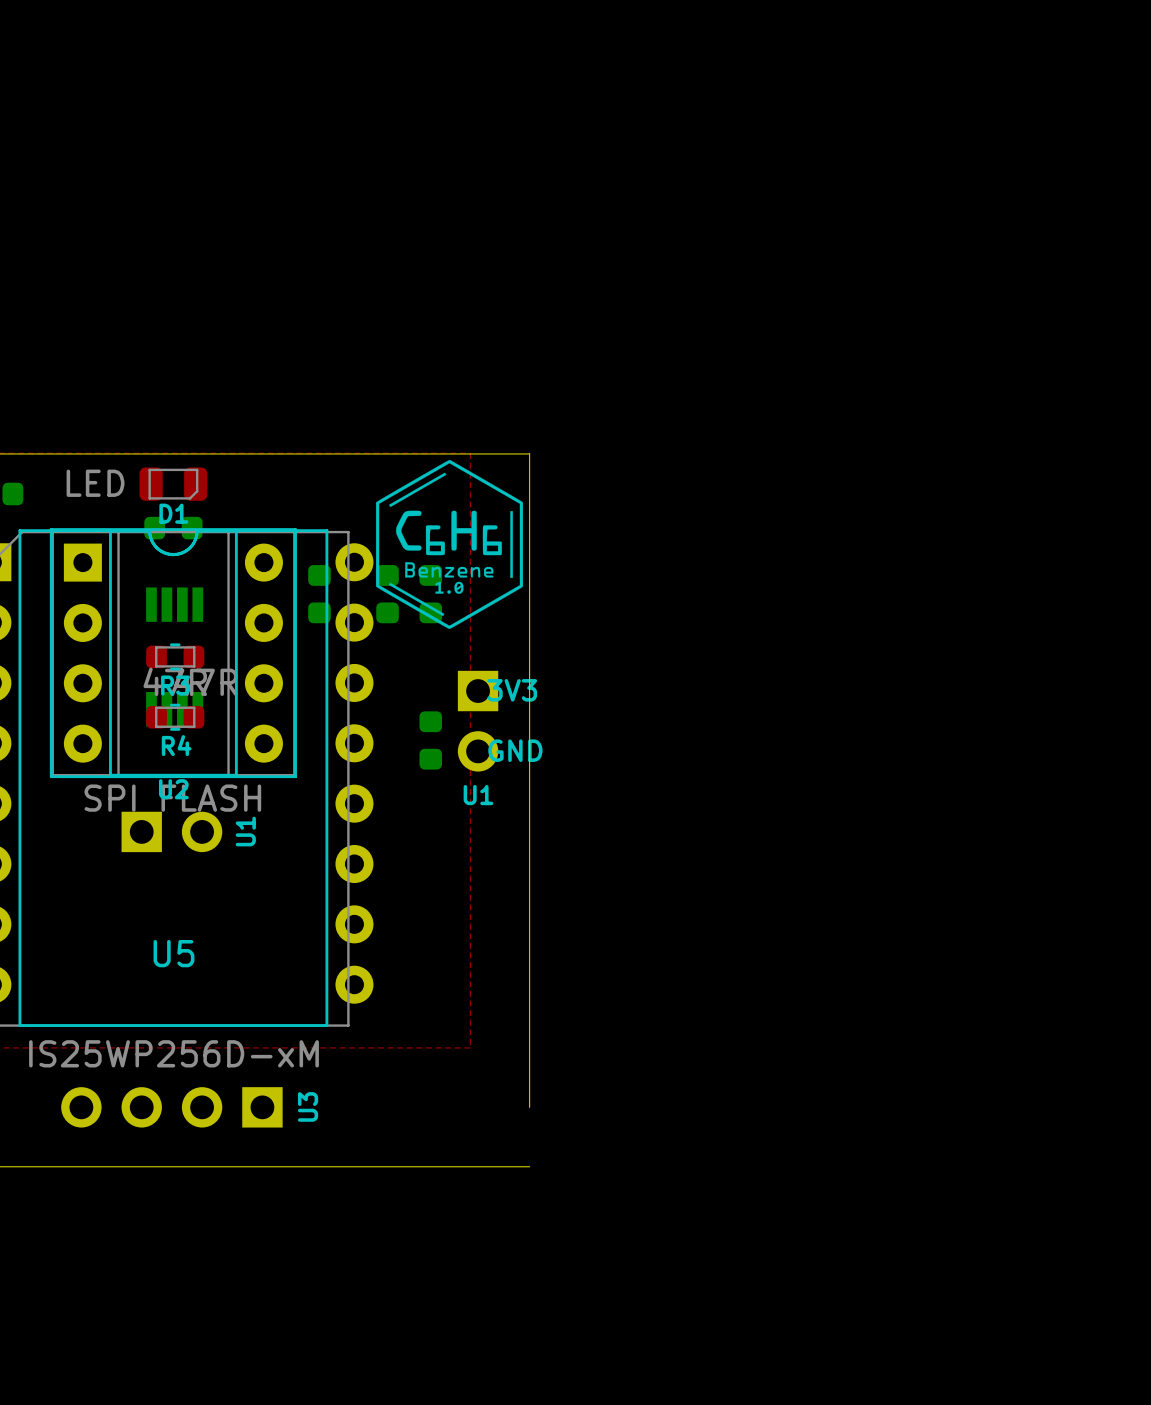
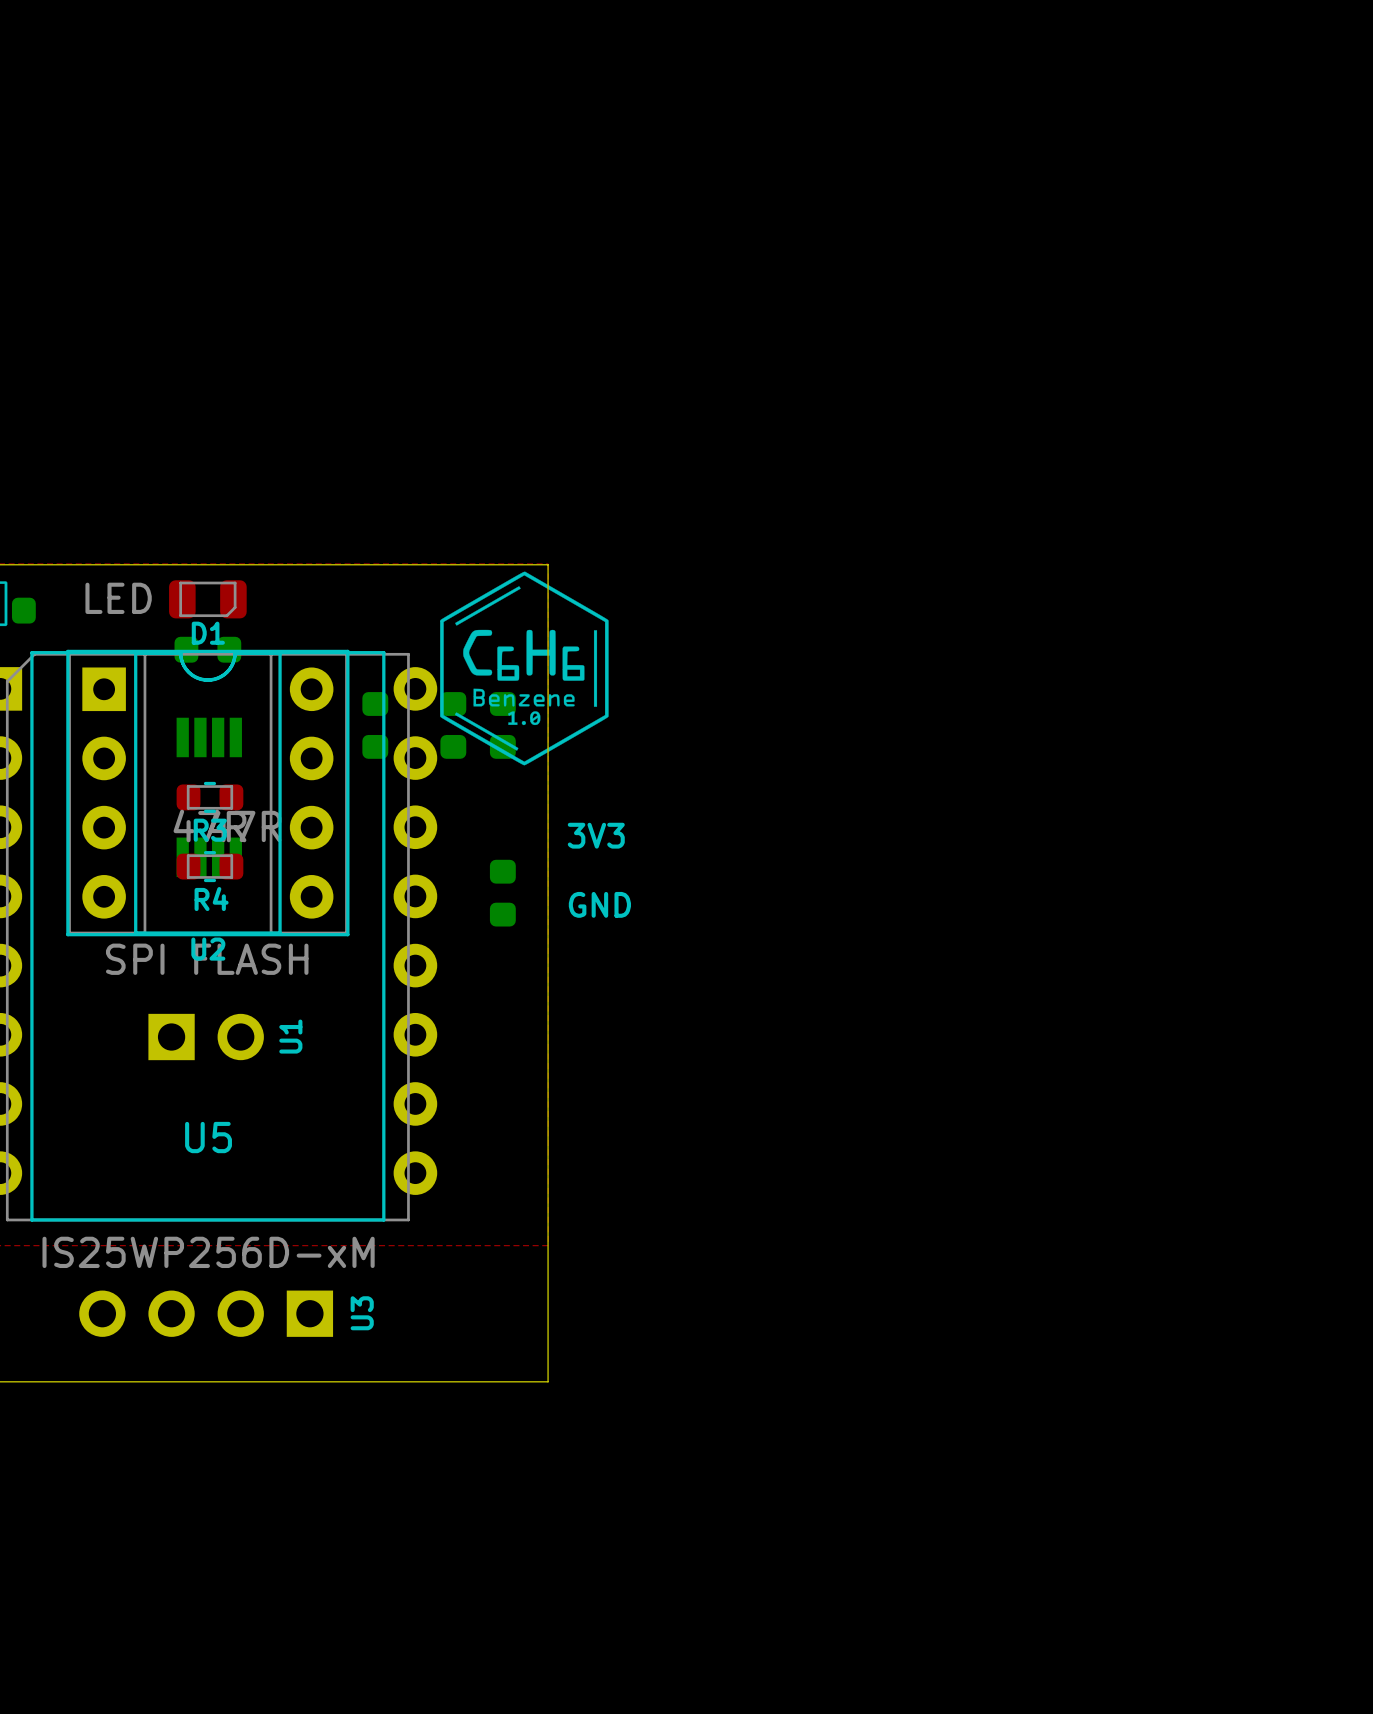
board edge: (470, 453) (529, 453) (529, 1107) -> (548, 564) (548, 1381)
U1: (478, 721) -> none
U1 position: (171, 831) -> (206, 1037)
board edge: (470, 1166) (529, 1166) -> none

